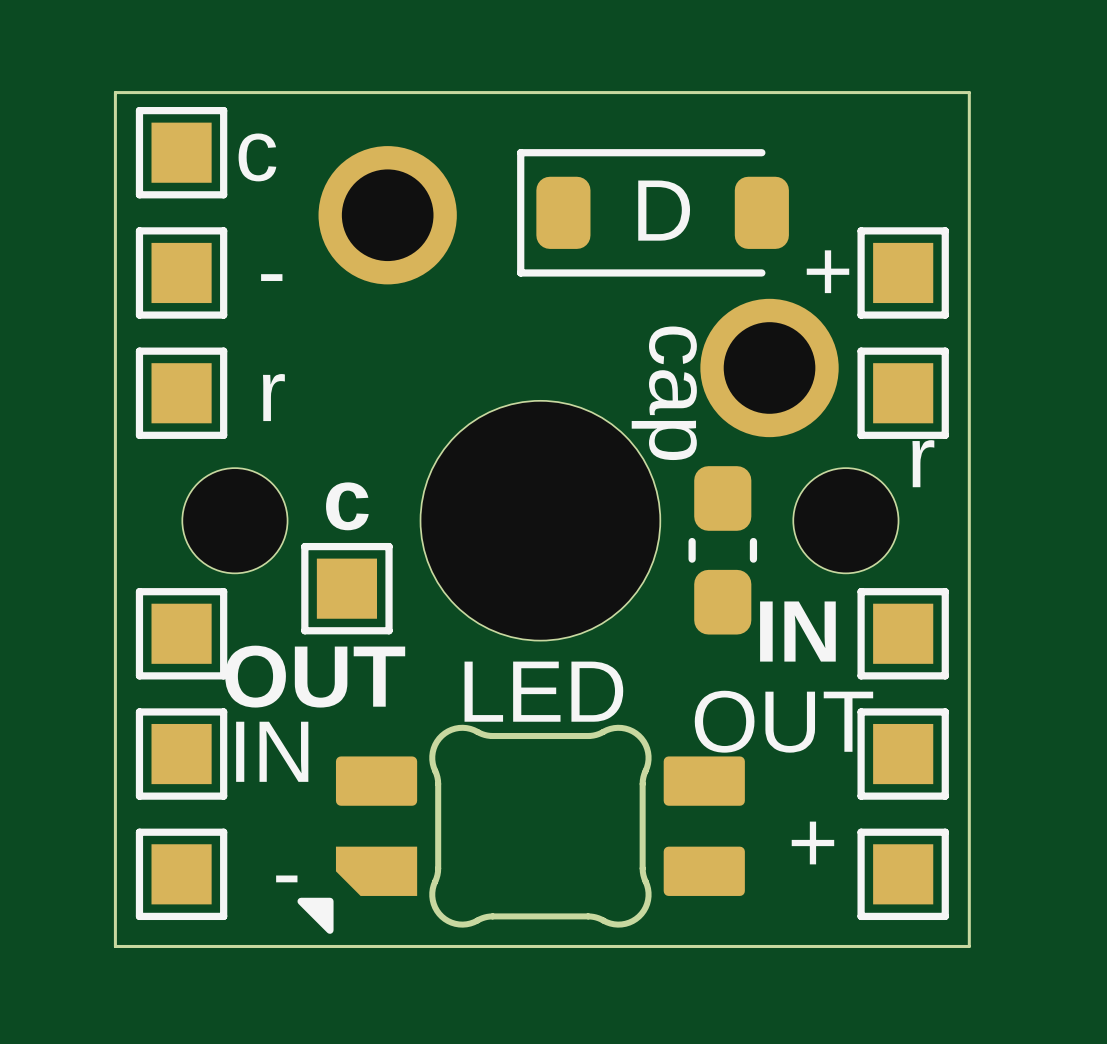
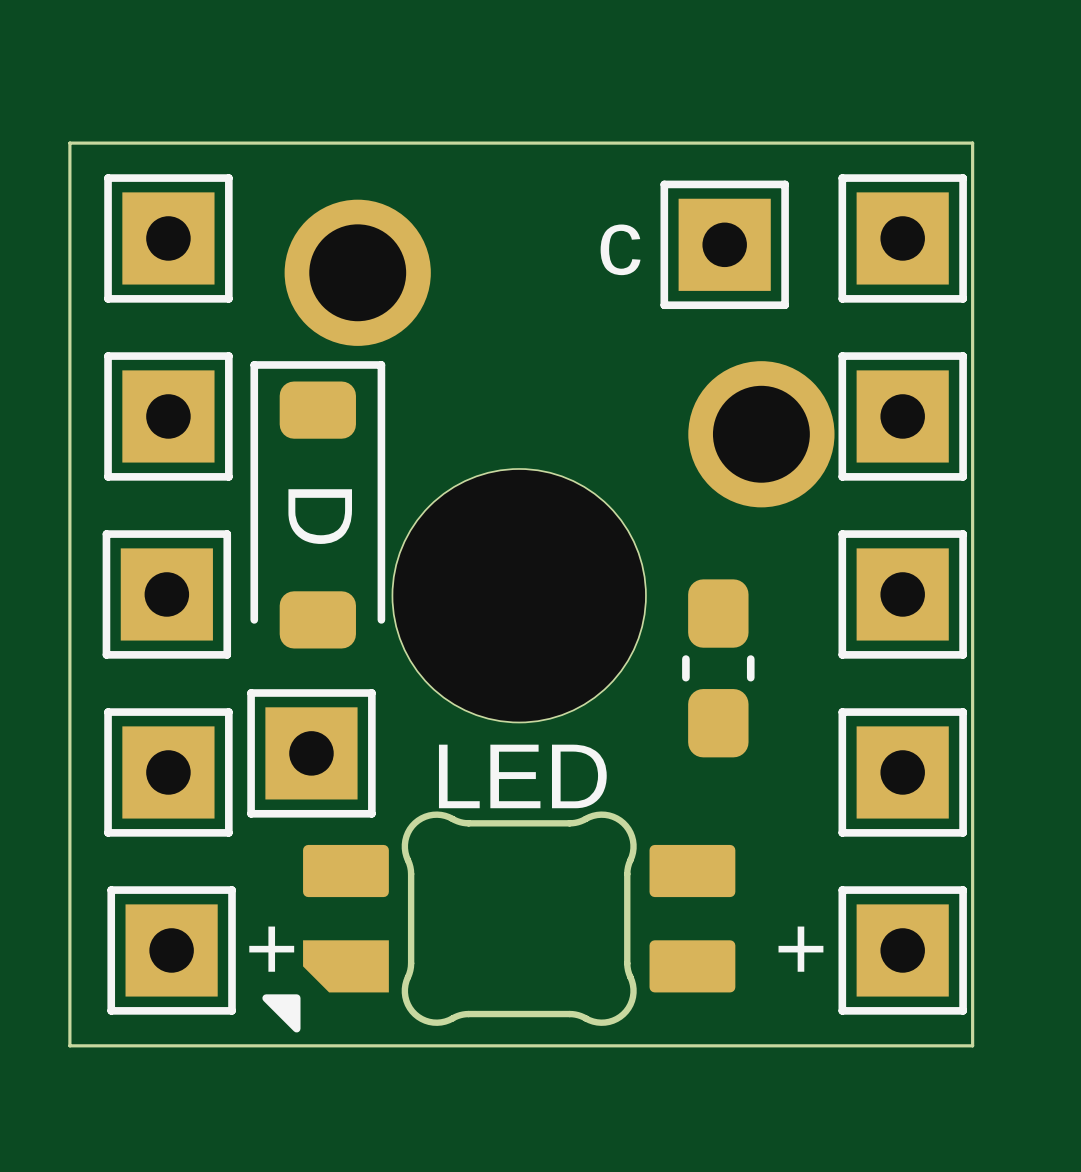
part footprint: [182, 146, 899, 641] -> [284, 199, 835, 723]
c: (181, 152) -> none
part: none -> (168, 238)
part: none -> (902, 238)
c: none -> (724, 244)
D rotation: 0° (653, 212) -> 90° clockwise (317, 504)
D position: (653, 212) -> (317, 504)
part: (181, 272) -> none
part: (903, 272) -> none
part: none -> (168, 416)
part: none -> (902, 416)
r: (181, 393) -> none
cap name: cap (664, 393) -> none
r: (903, 393) -> none
part: none -> (166, 594)
part: none -> (902, 594)
cap position: (722, 550) -> (718, 668)
c: (346, 588) -> none
OUT: (181, 633) -> none
IN: (903, 633) -> none
part: none -> (311, 753)
part: none -> (168, 772)
part: none -> (902, 772)
IN: (181, 754) -> none
OUT: (903, 754) -> none
part footprint: [857, 828, 949, 921] -> [838, 886, 967, 1015]
part: none -> (171, 950)
part: (181, 874) -> none

